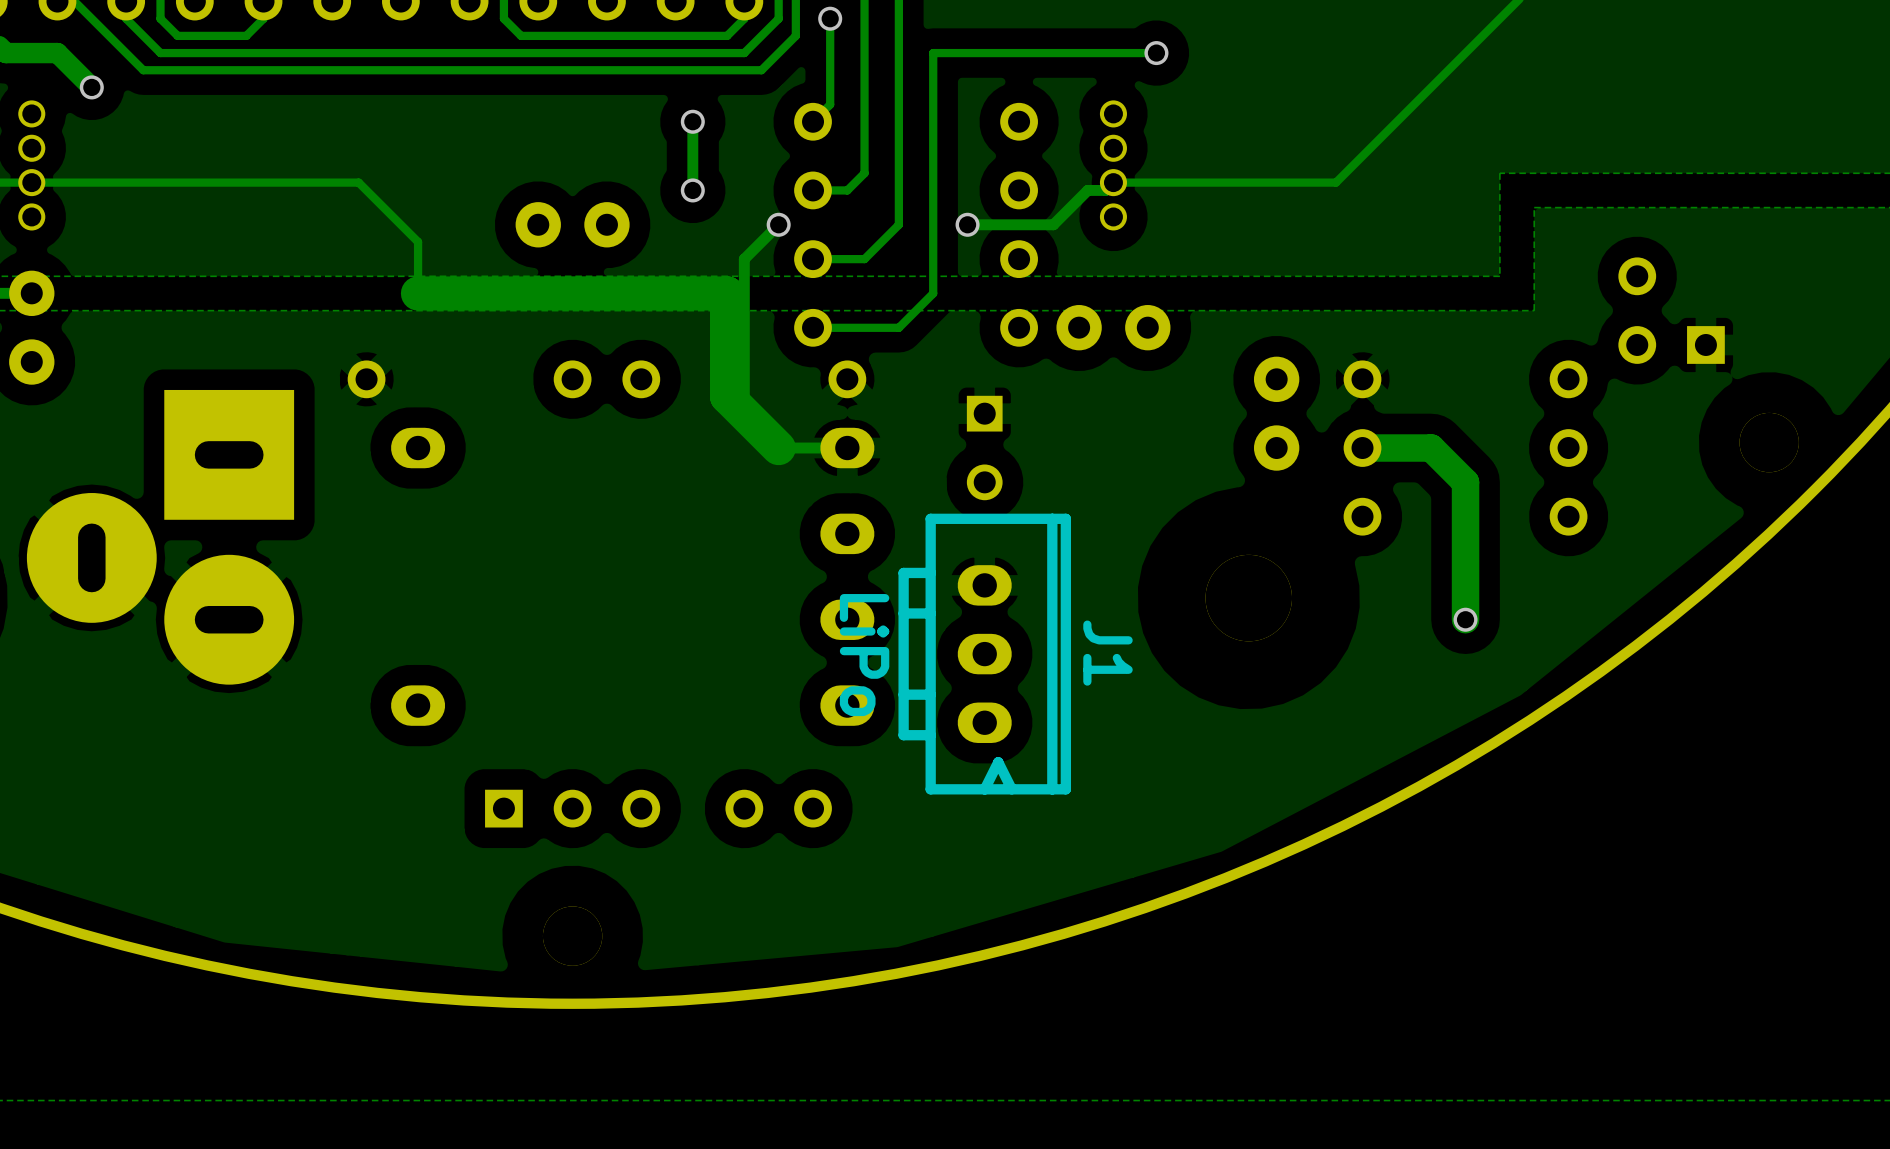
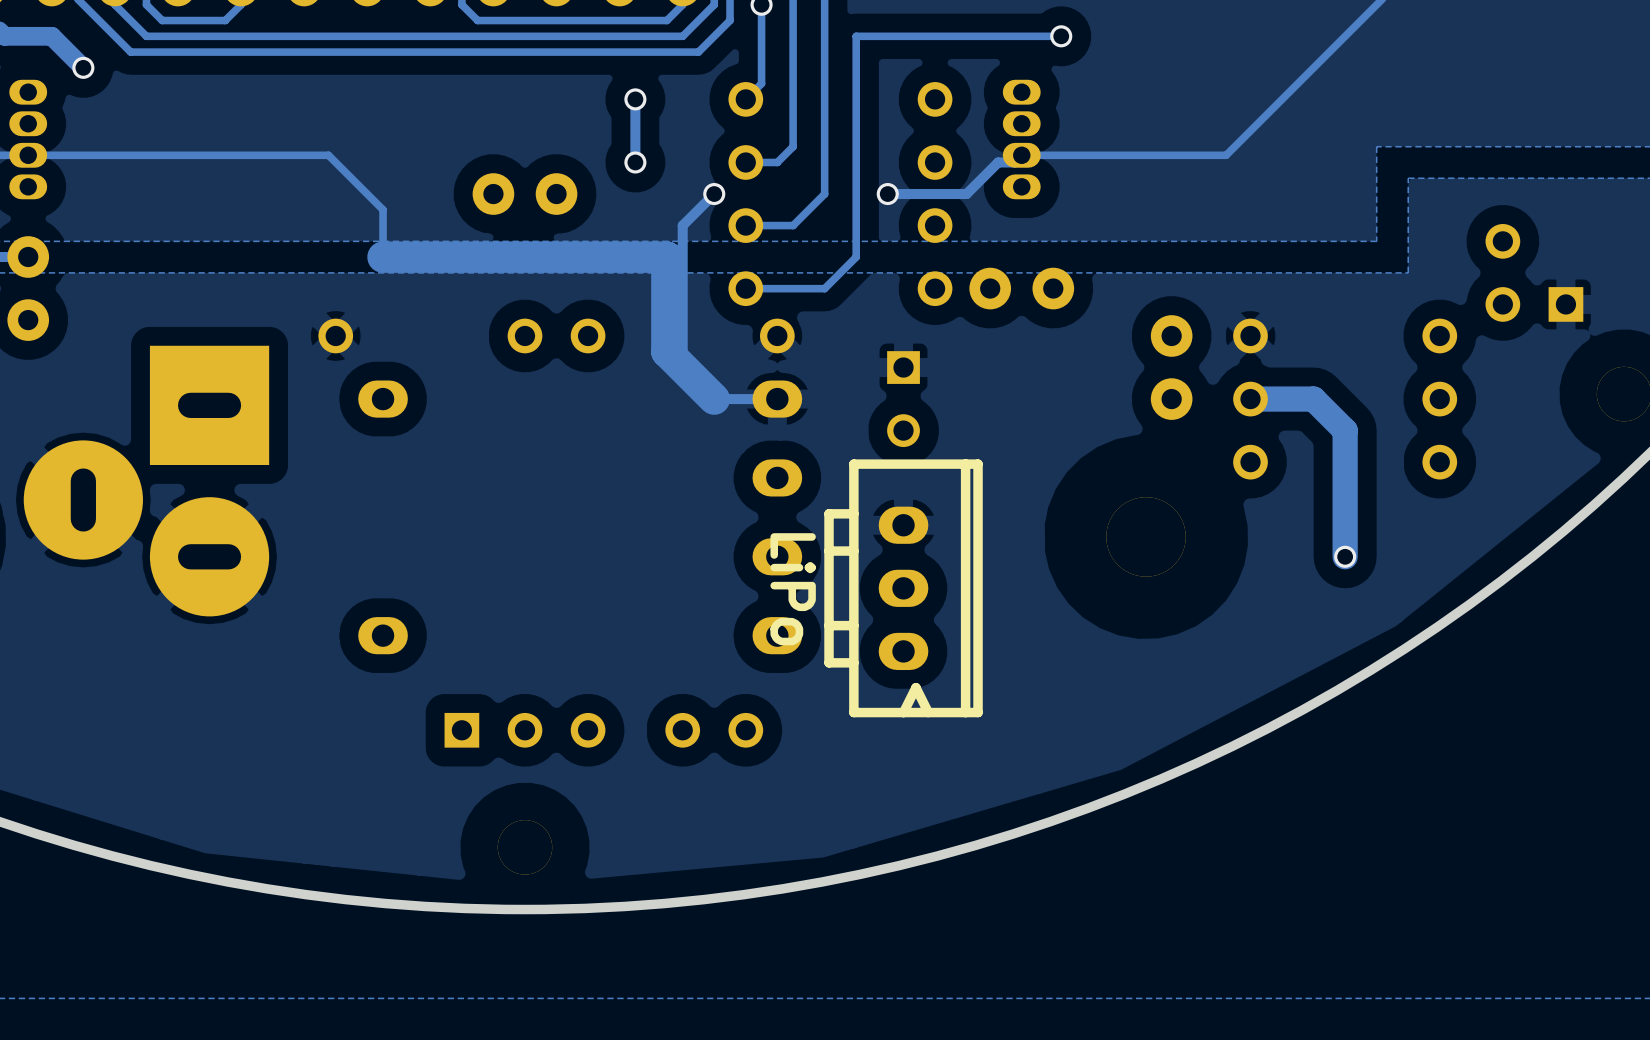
part footprint: [18, 100, 46, 231] -> [9, 79, 48, 200]
part footprint: [1099, 100, 1127, 231] -> [1002, 79, 1041, 200]
J1 name: J1 (1107, 653) -> none

